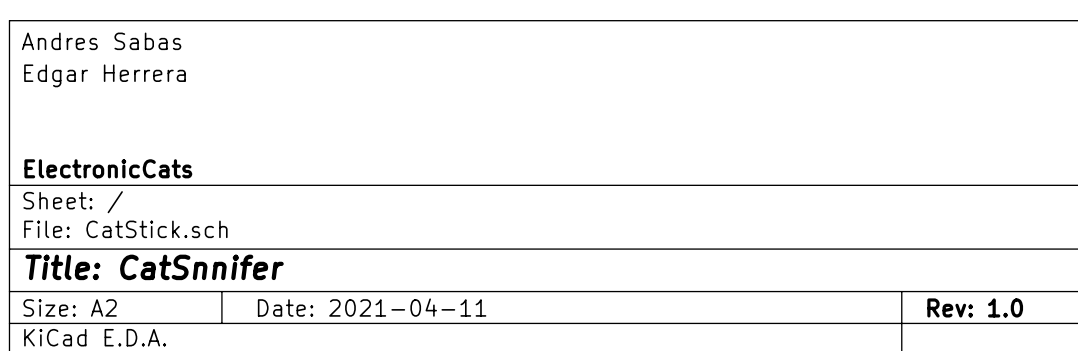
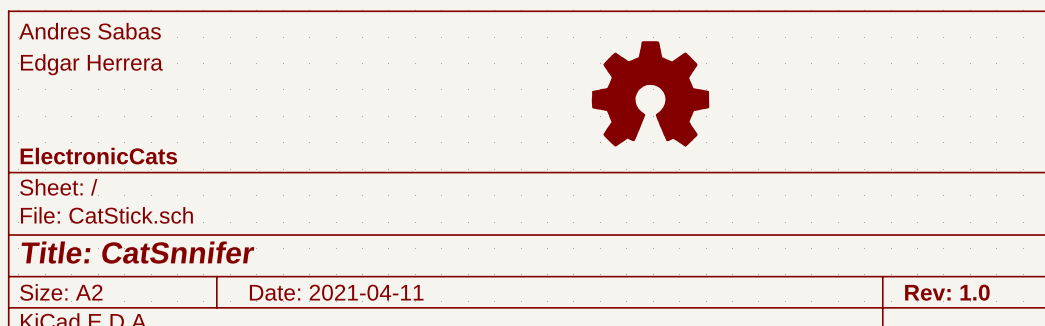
power symbol: none -> (650, 93)

